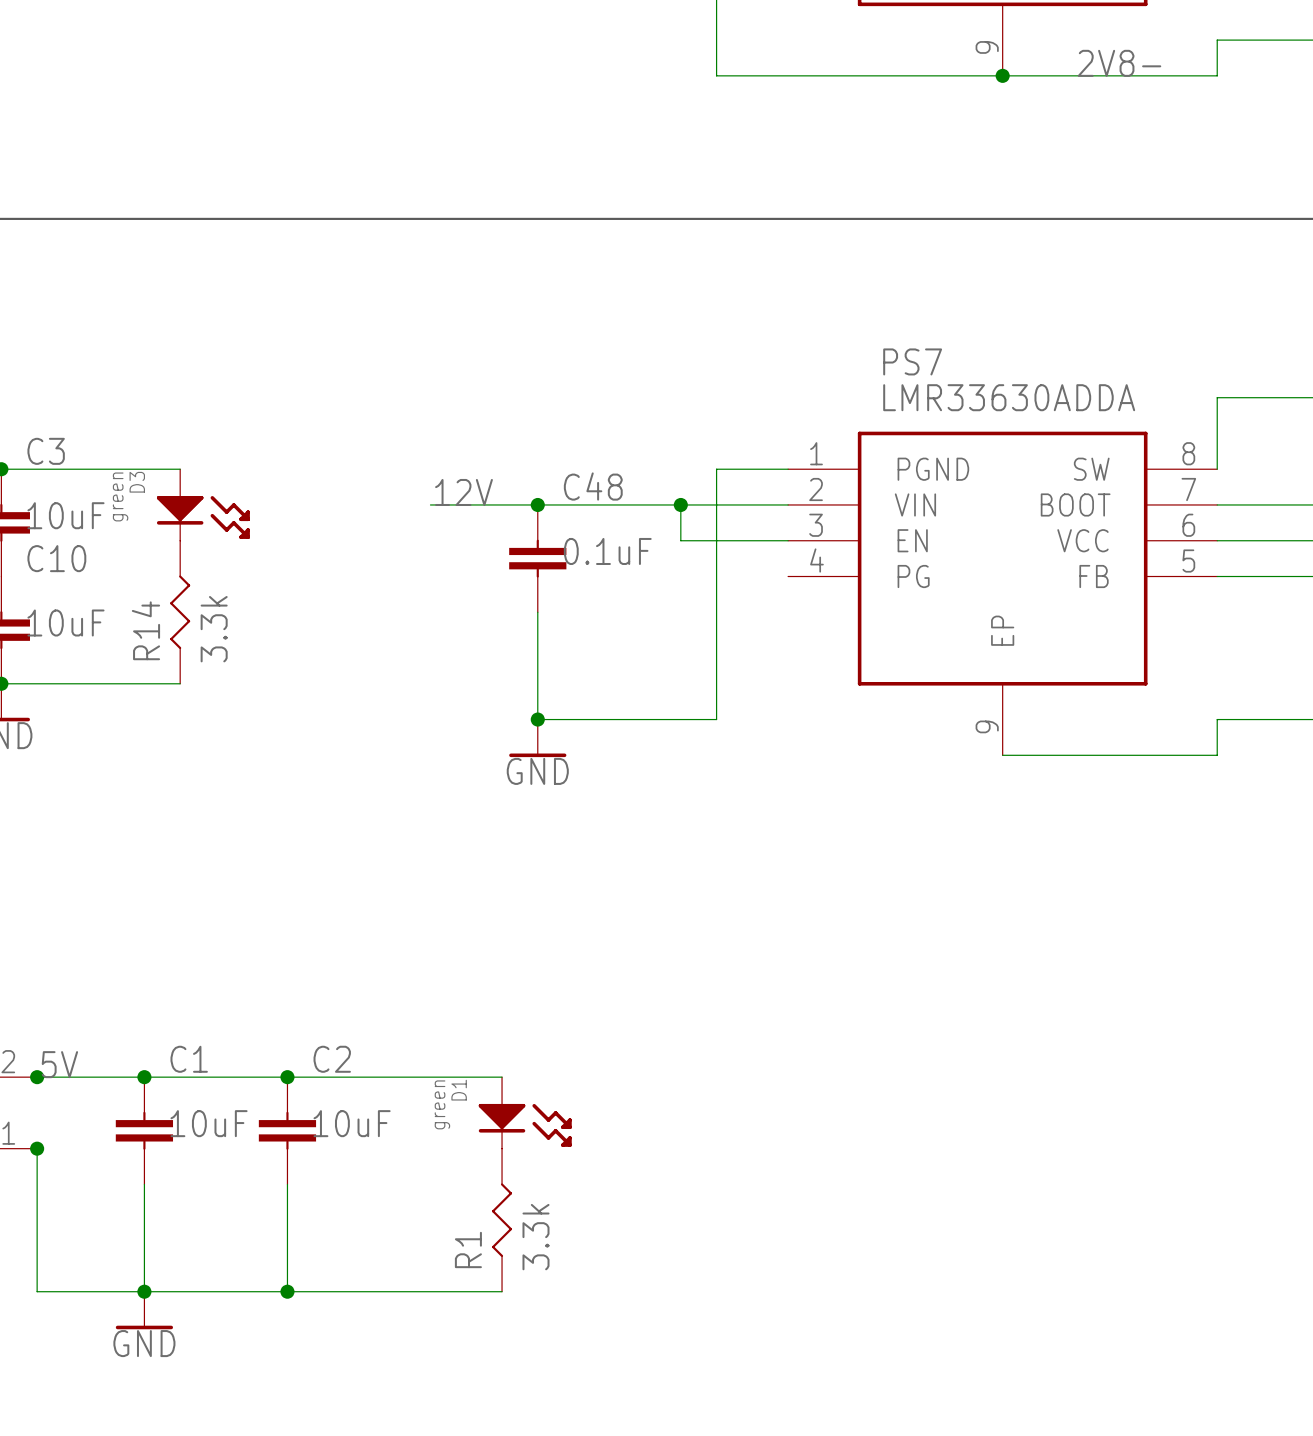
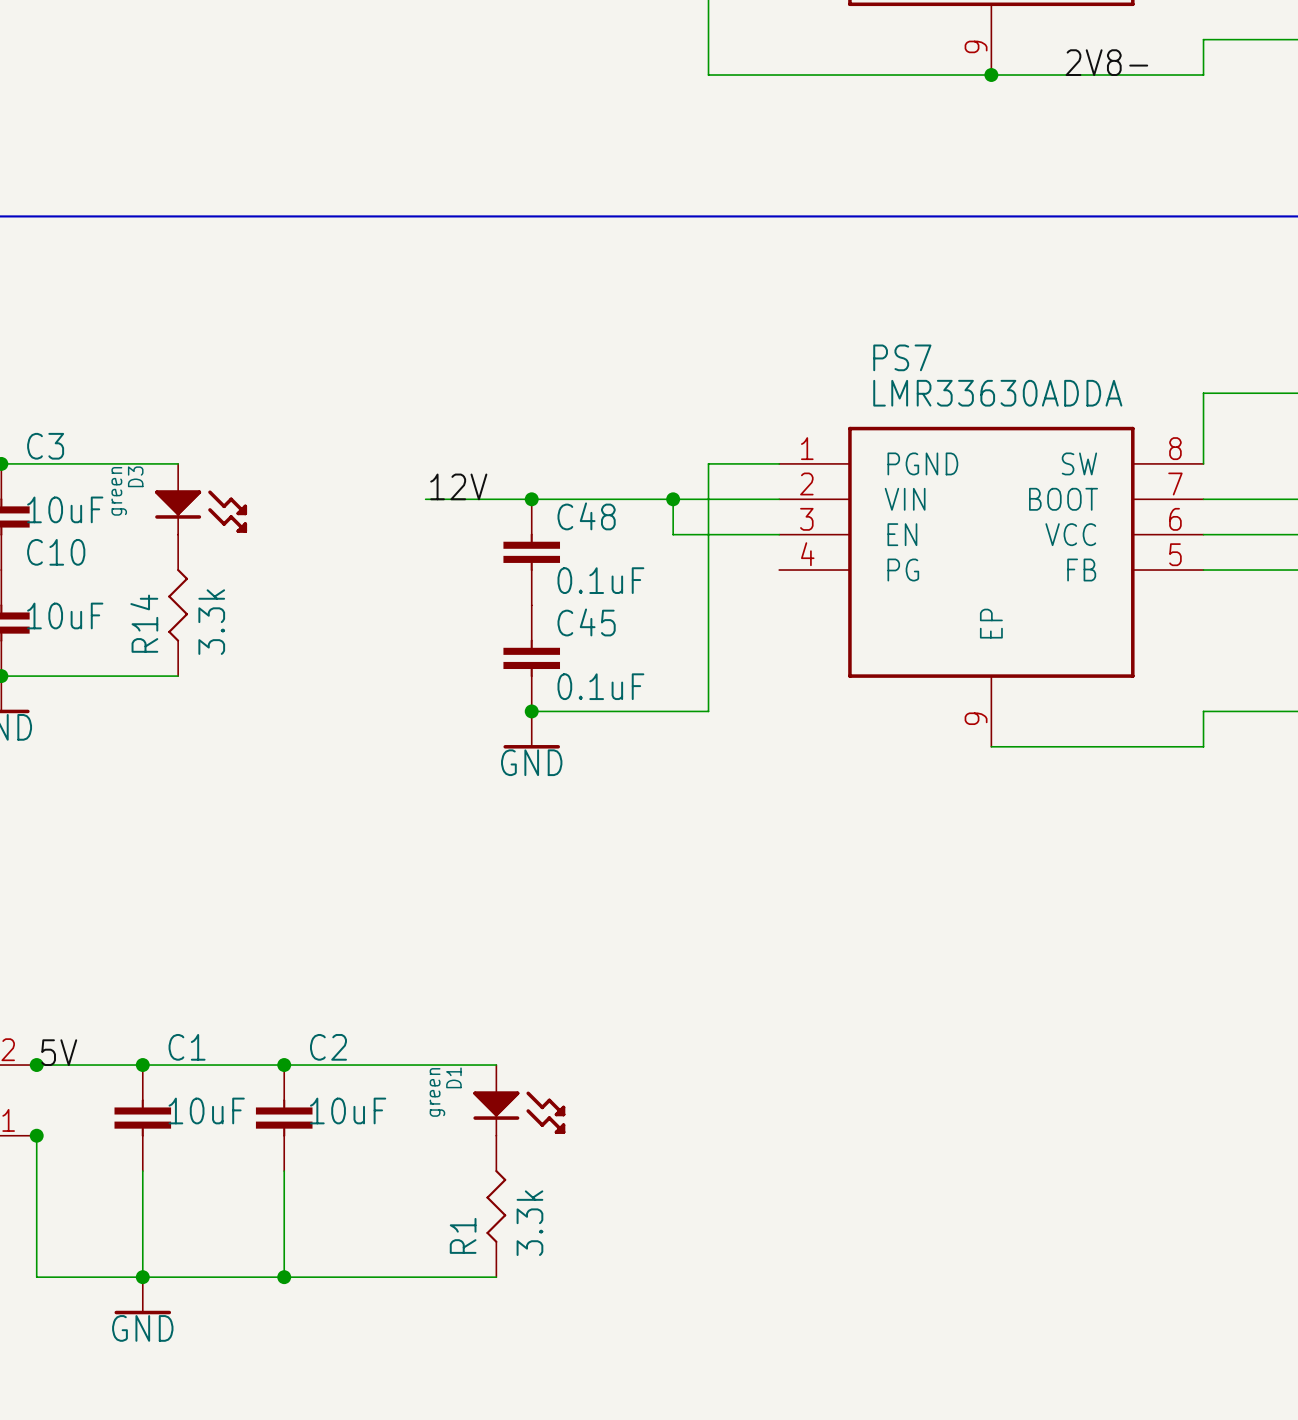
C48 name position: C48 (593, 486) -> C48 (586, 516)
C48 value position: 0.1uF (607, 551) -> 0.1uF (600, 580)
C45: none -> 0.1uF (531, 658)

